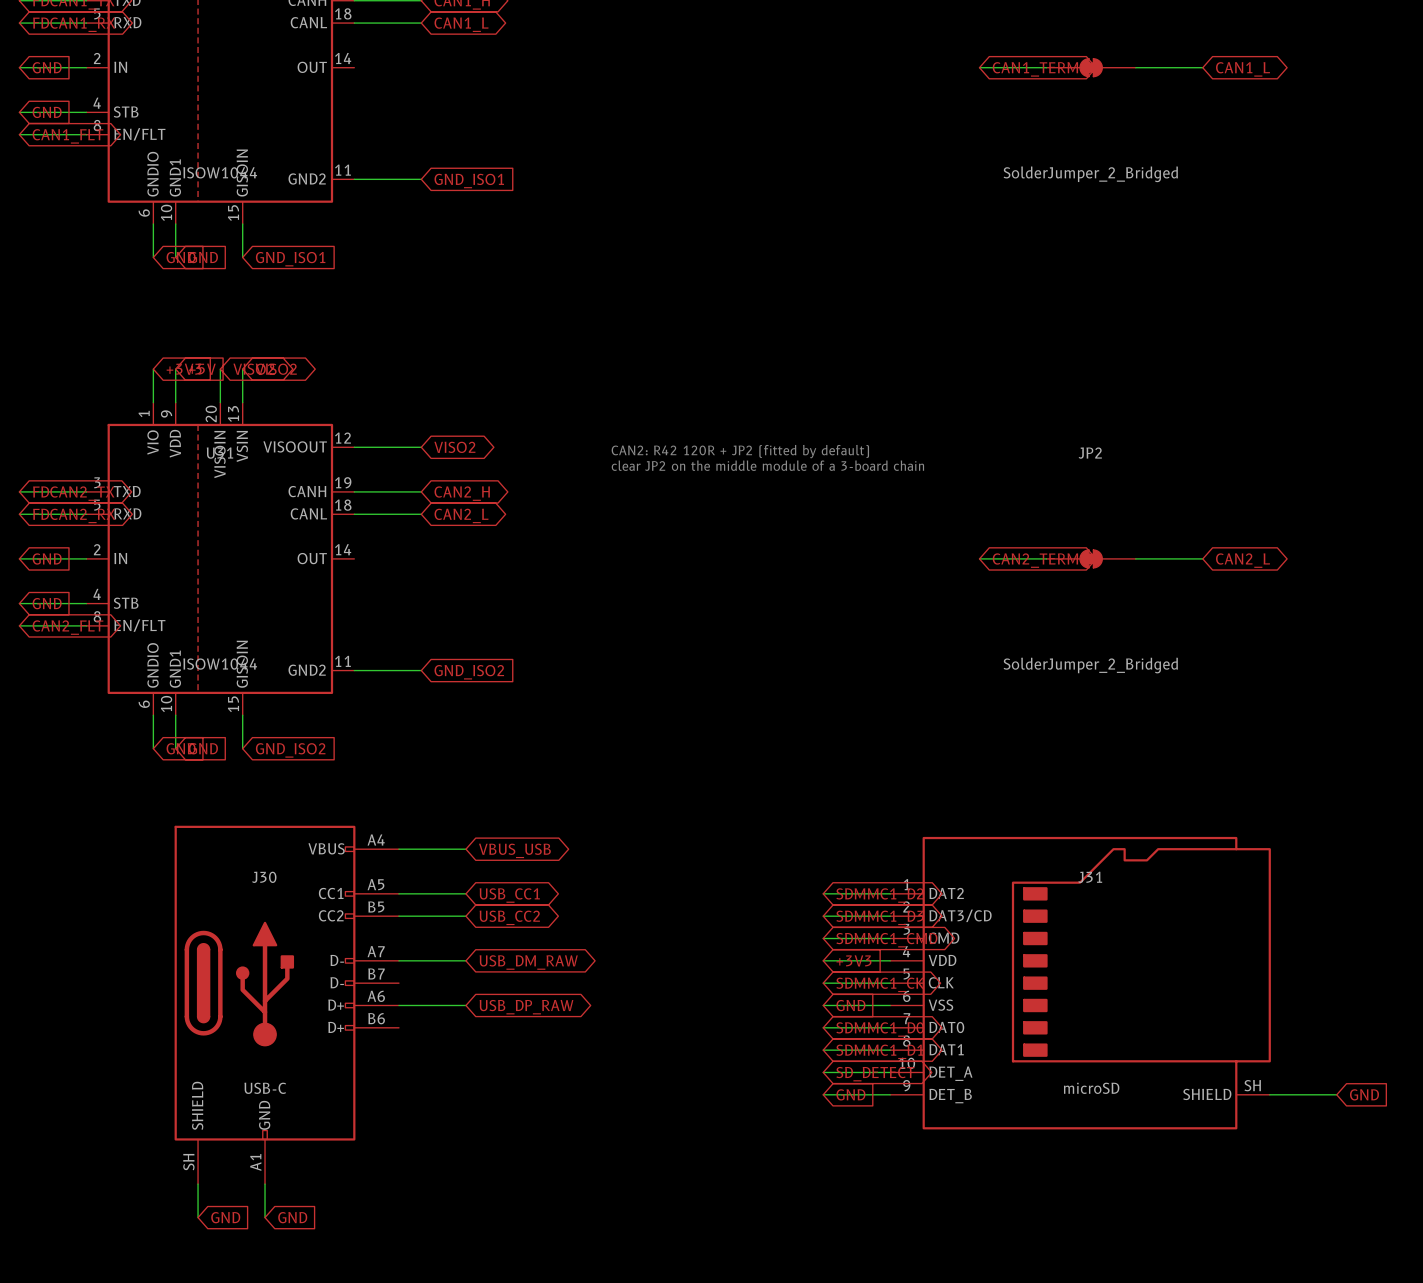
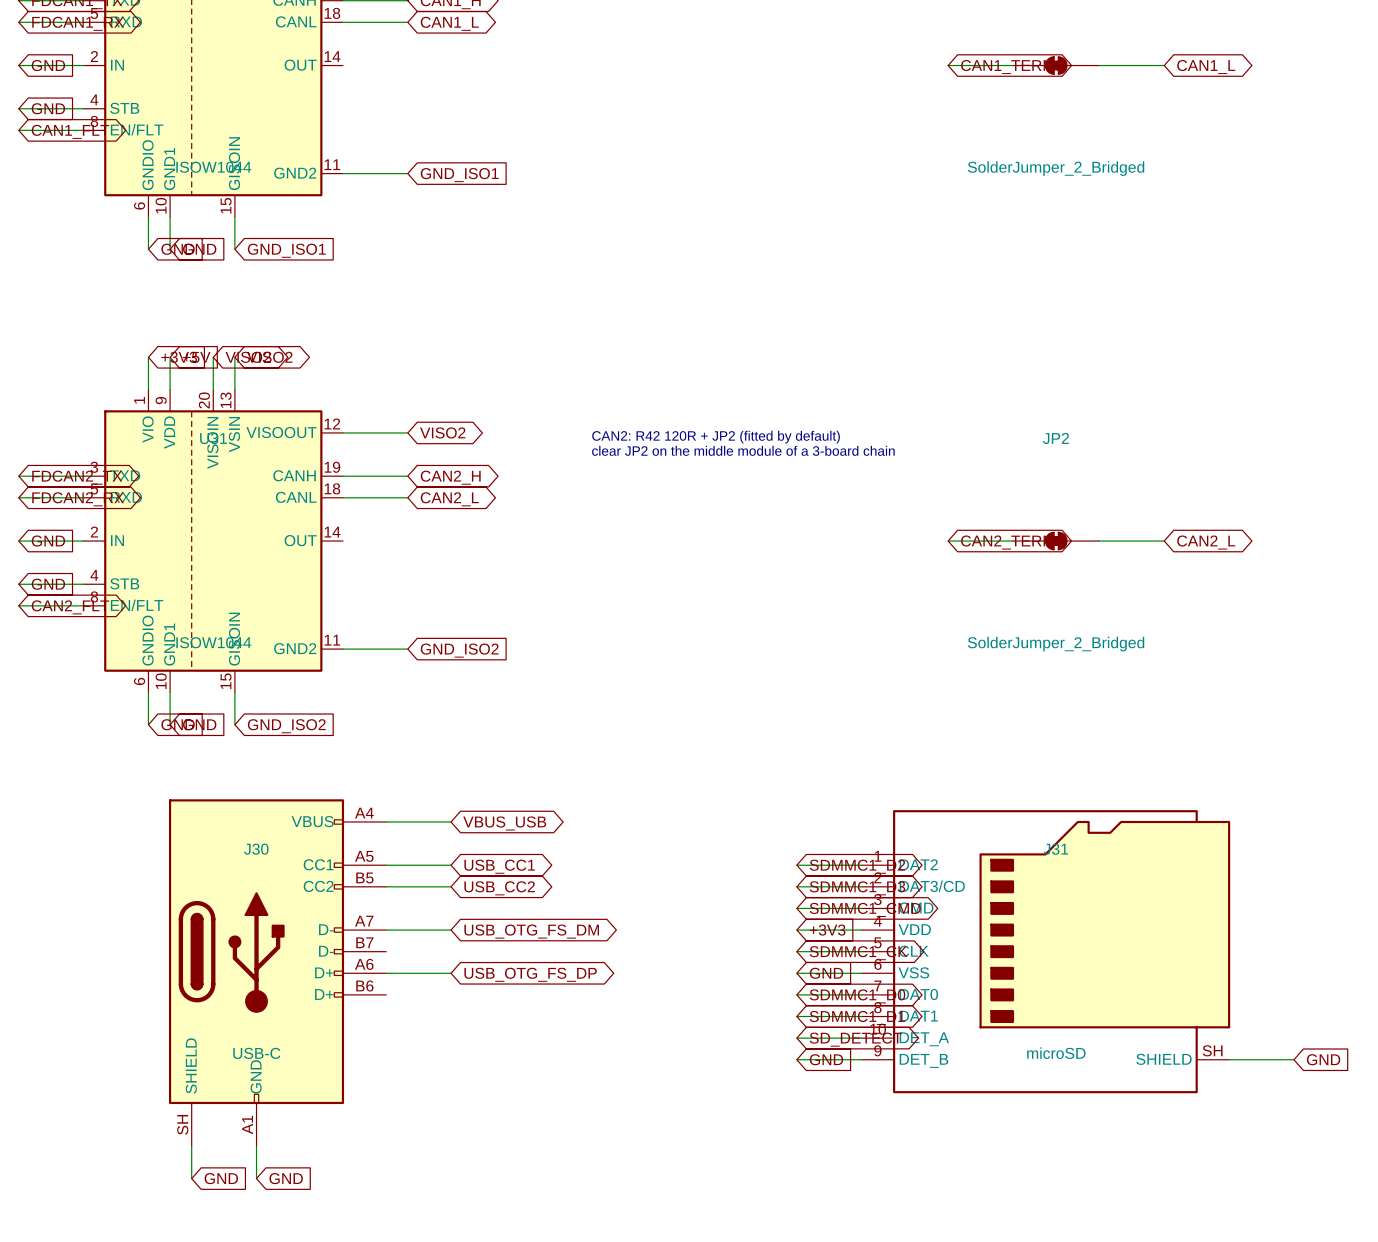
global label: USB_DM_RAW (528, 962) -> USB_OTG_FS_DM (531, 931)
global label: USB_DP_RAW (526, 1007) -> USB_OTG_FS_DP (530, 974)

